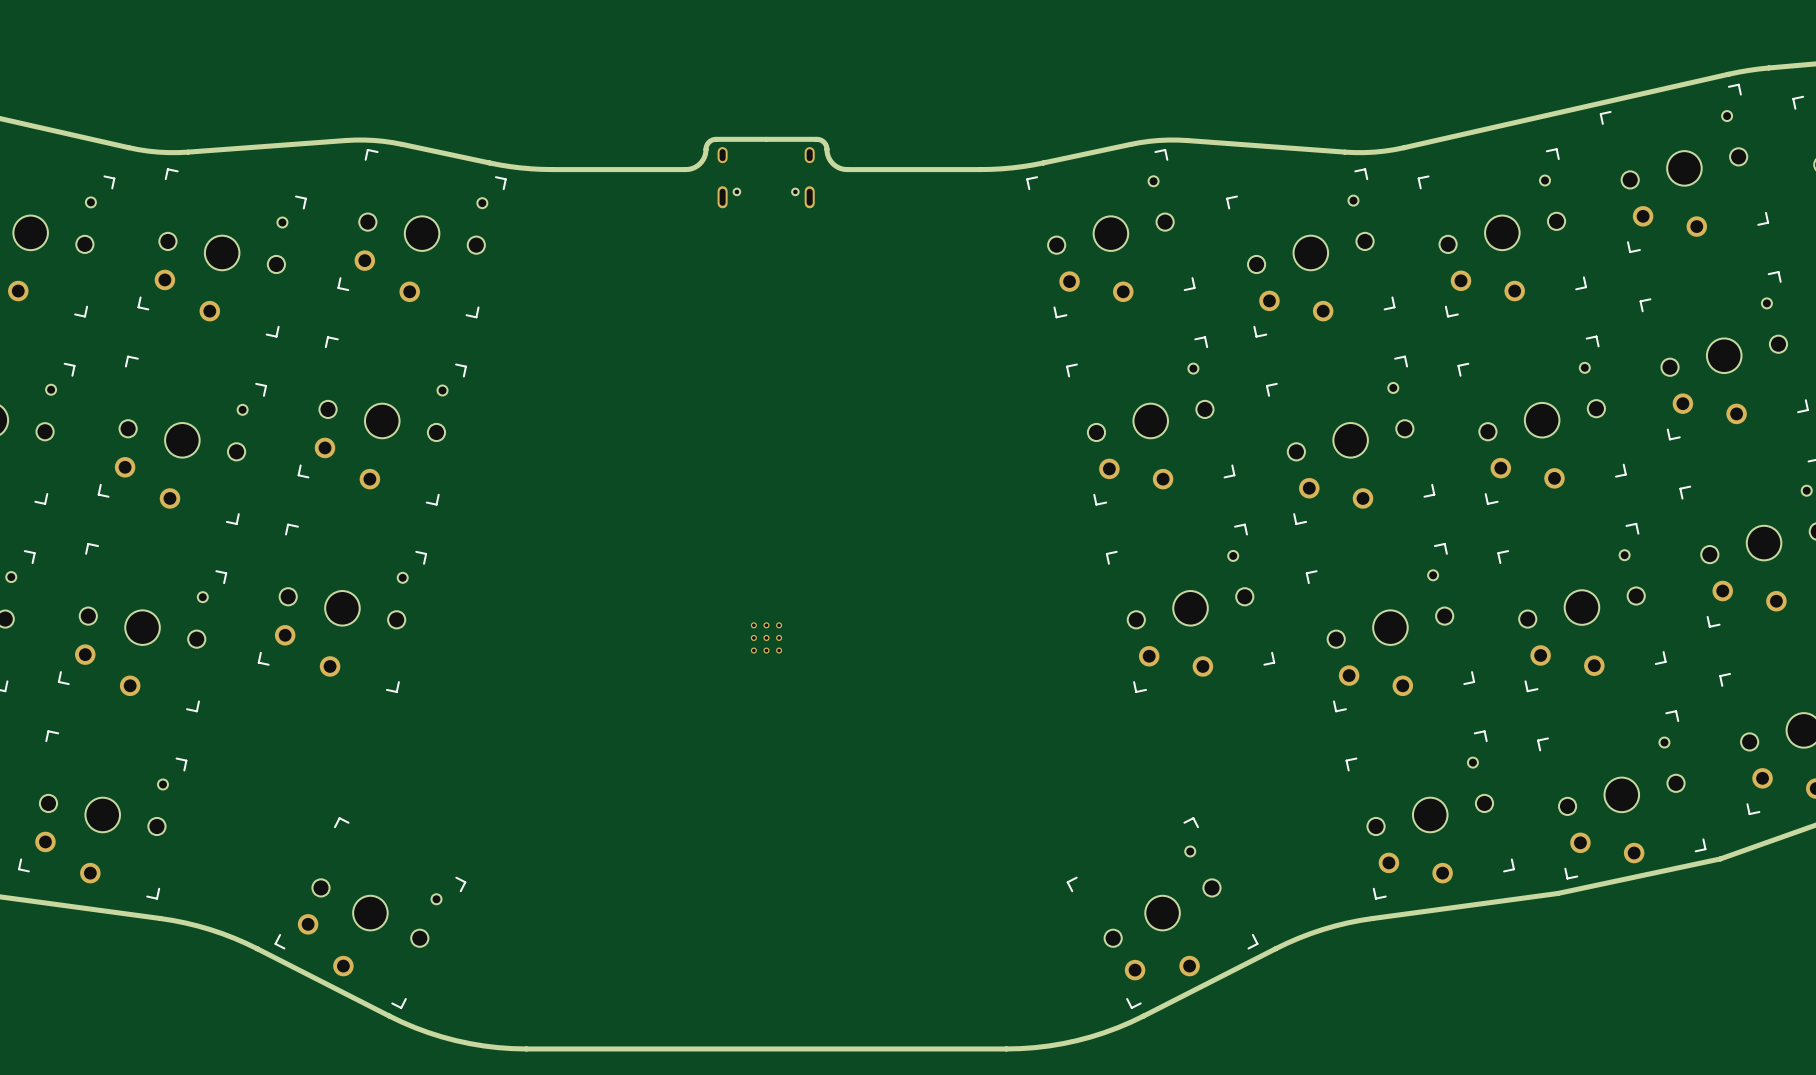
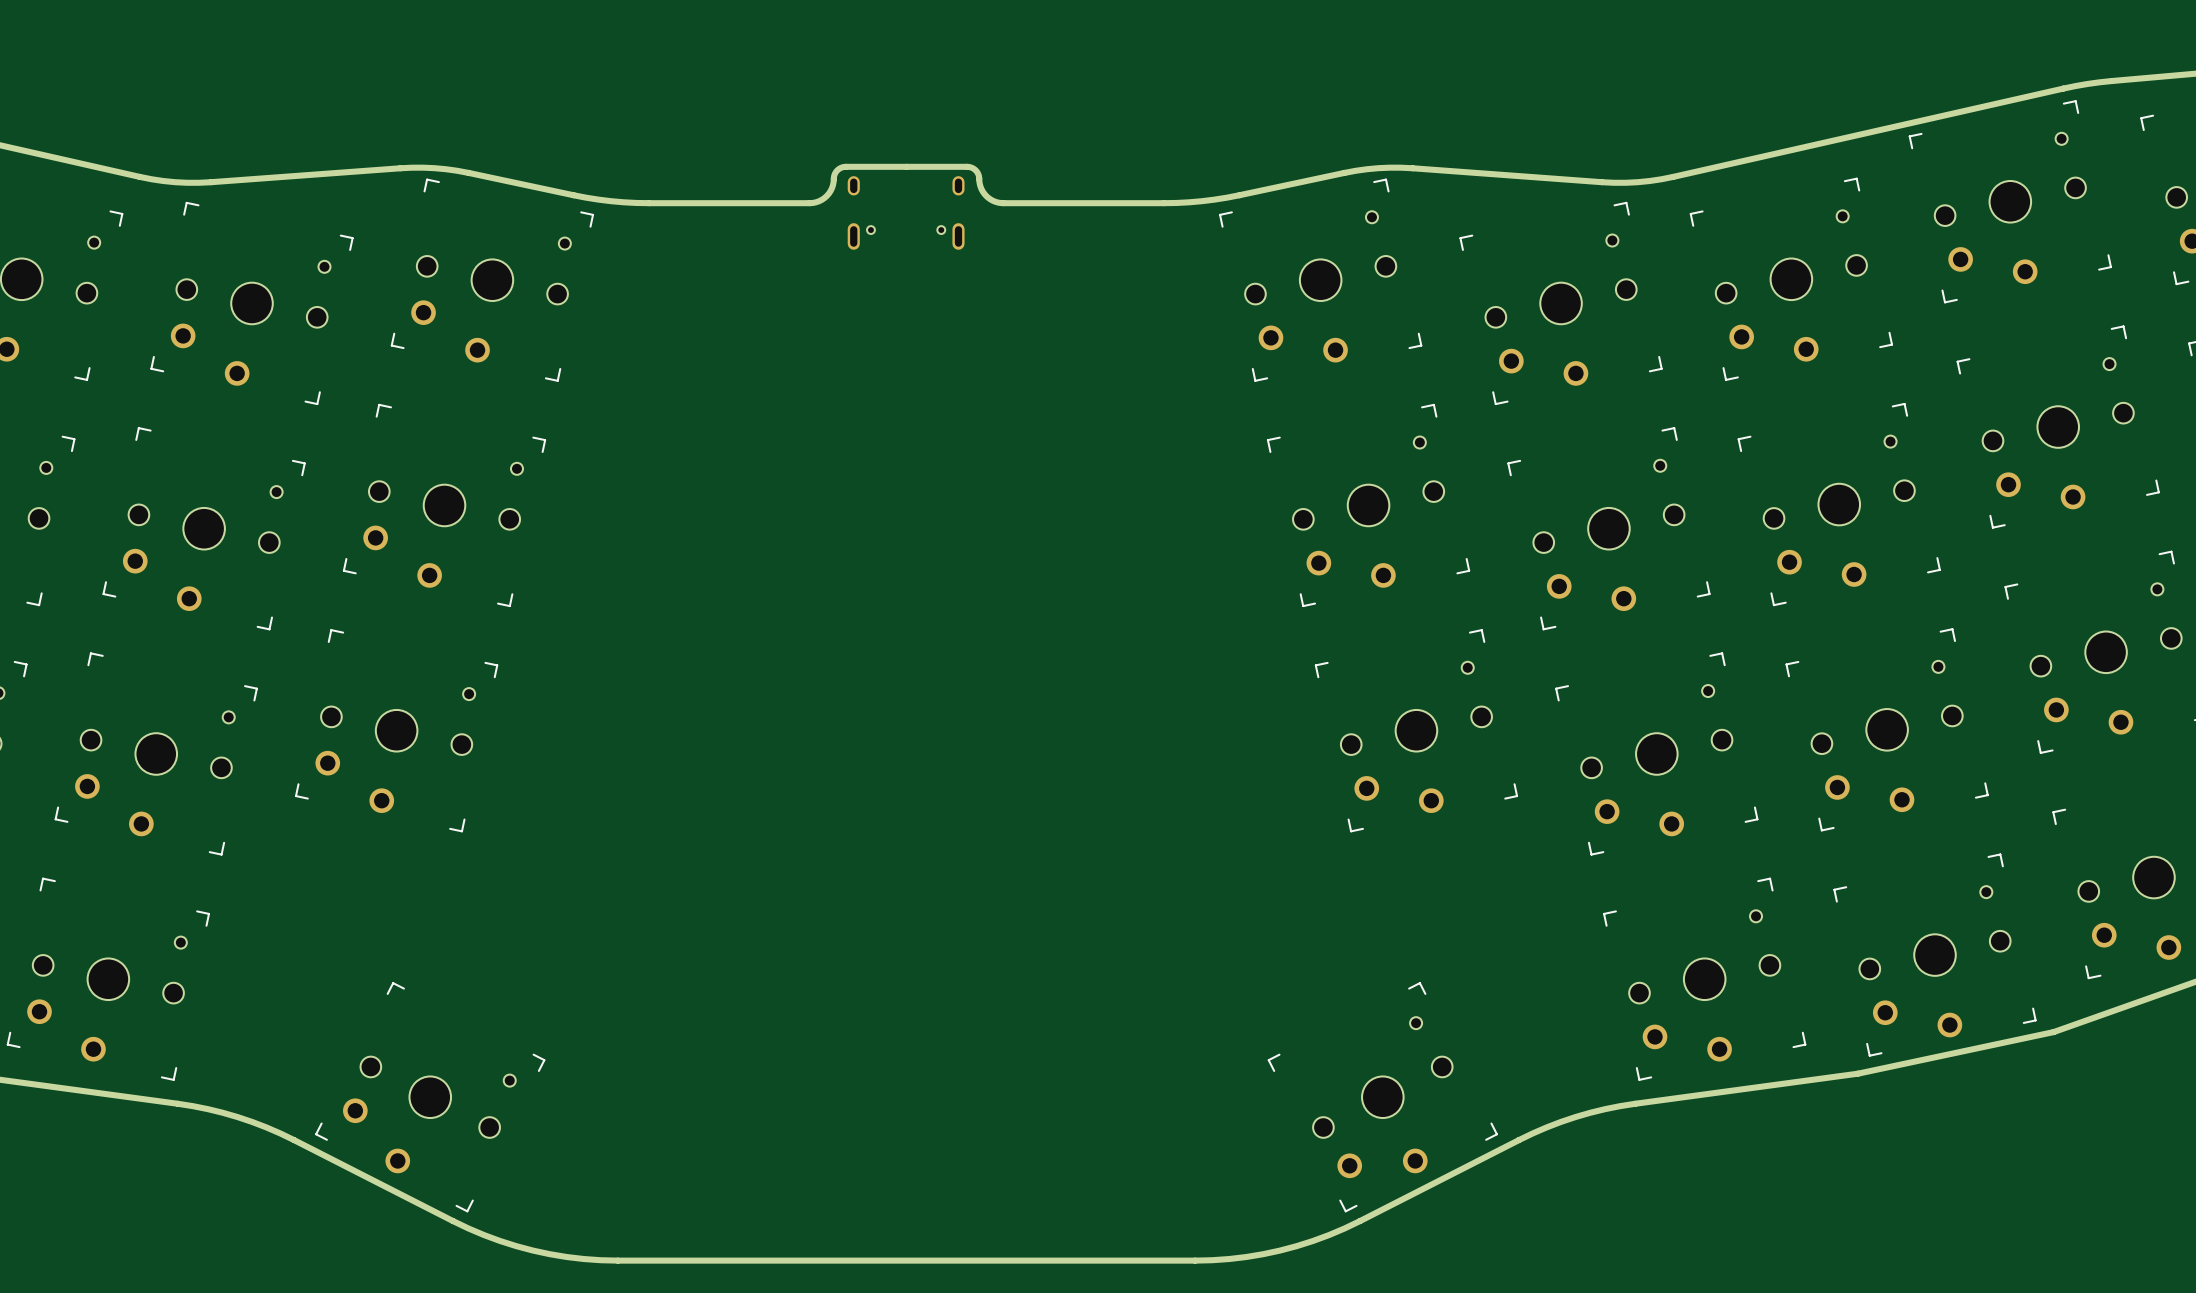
part: (753, 625) -> none
part: (766, 625) -> none
part: (779, 625) -> none
part: (753, 637) -> none
part: (766, 637) -> none
part: (779, 637) -> none
part: (753, 650) -> none
part: (766, 650) -> none
part: (779, 650) -> none

